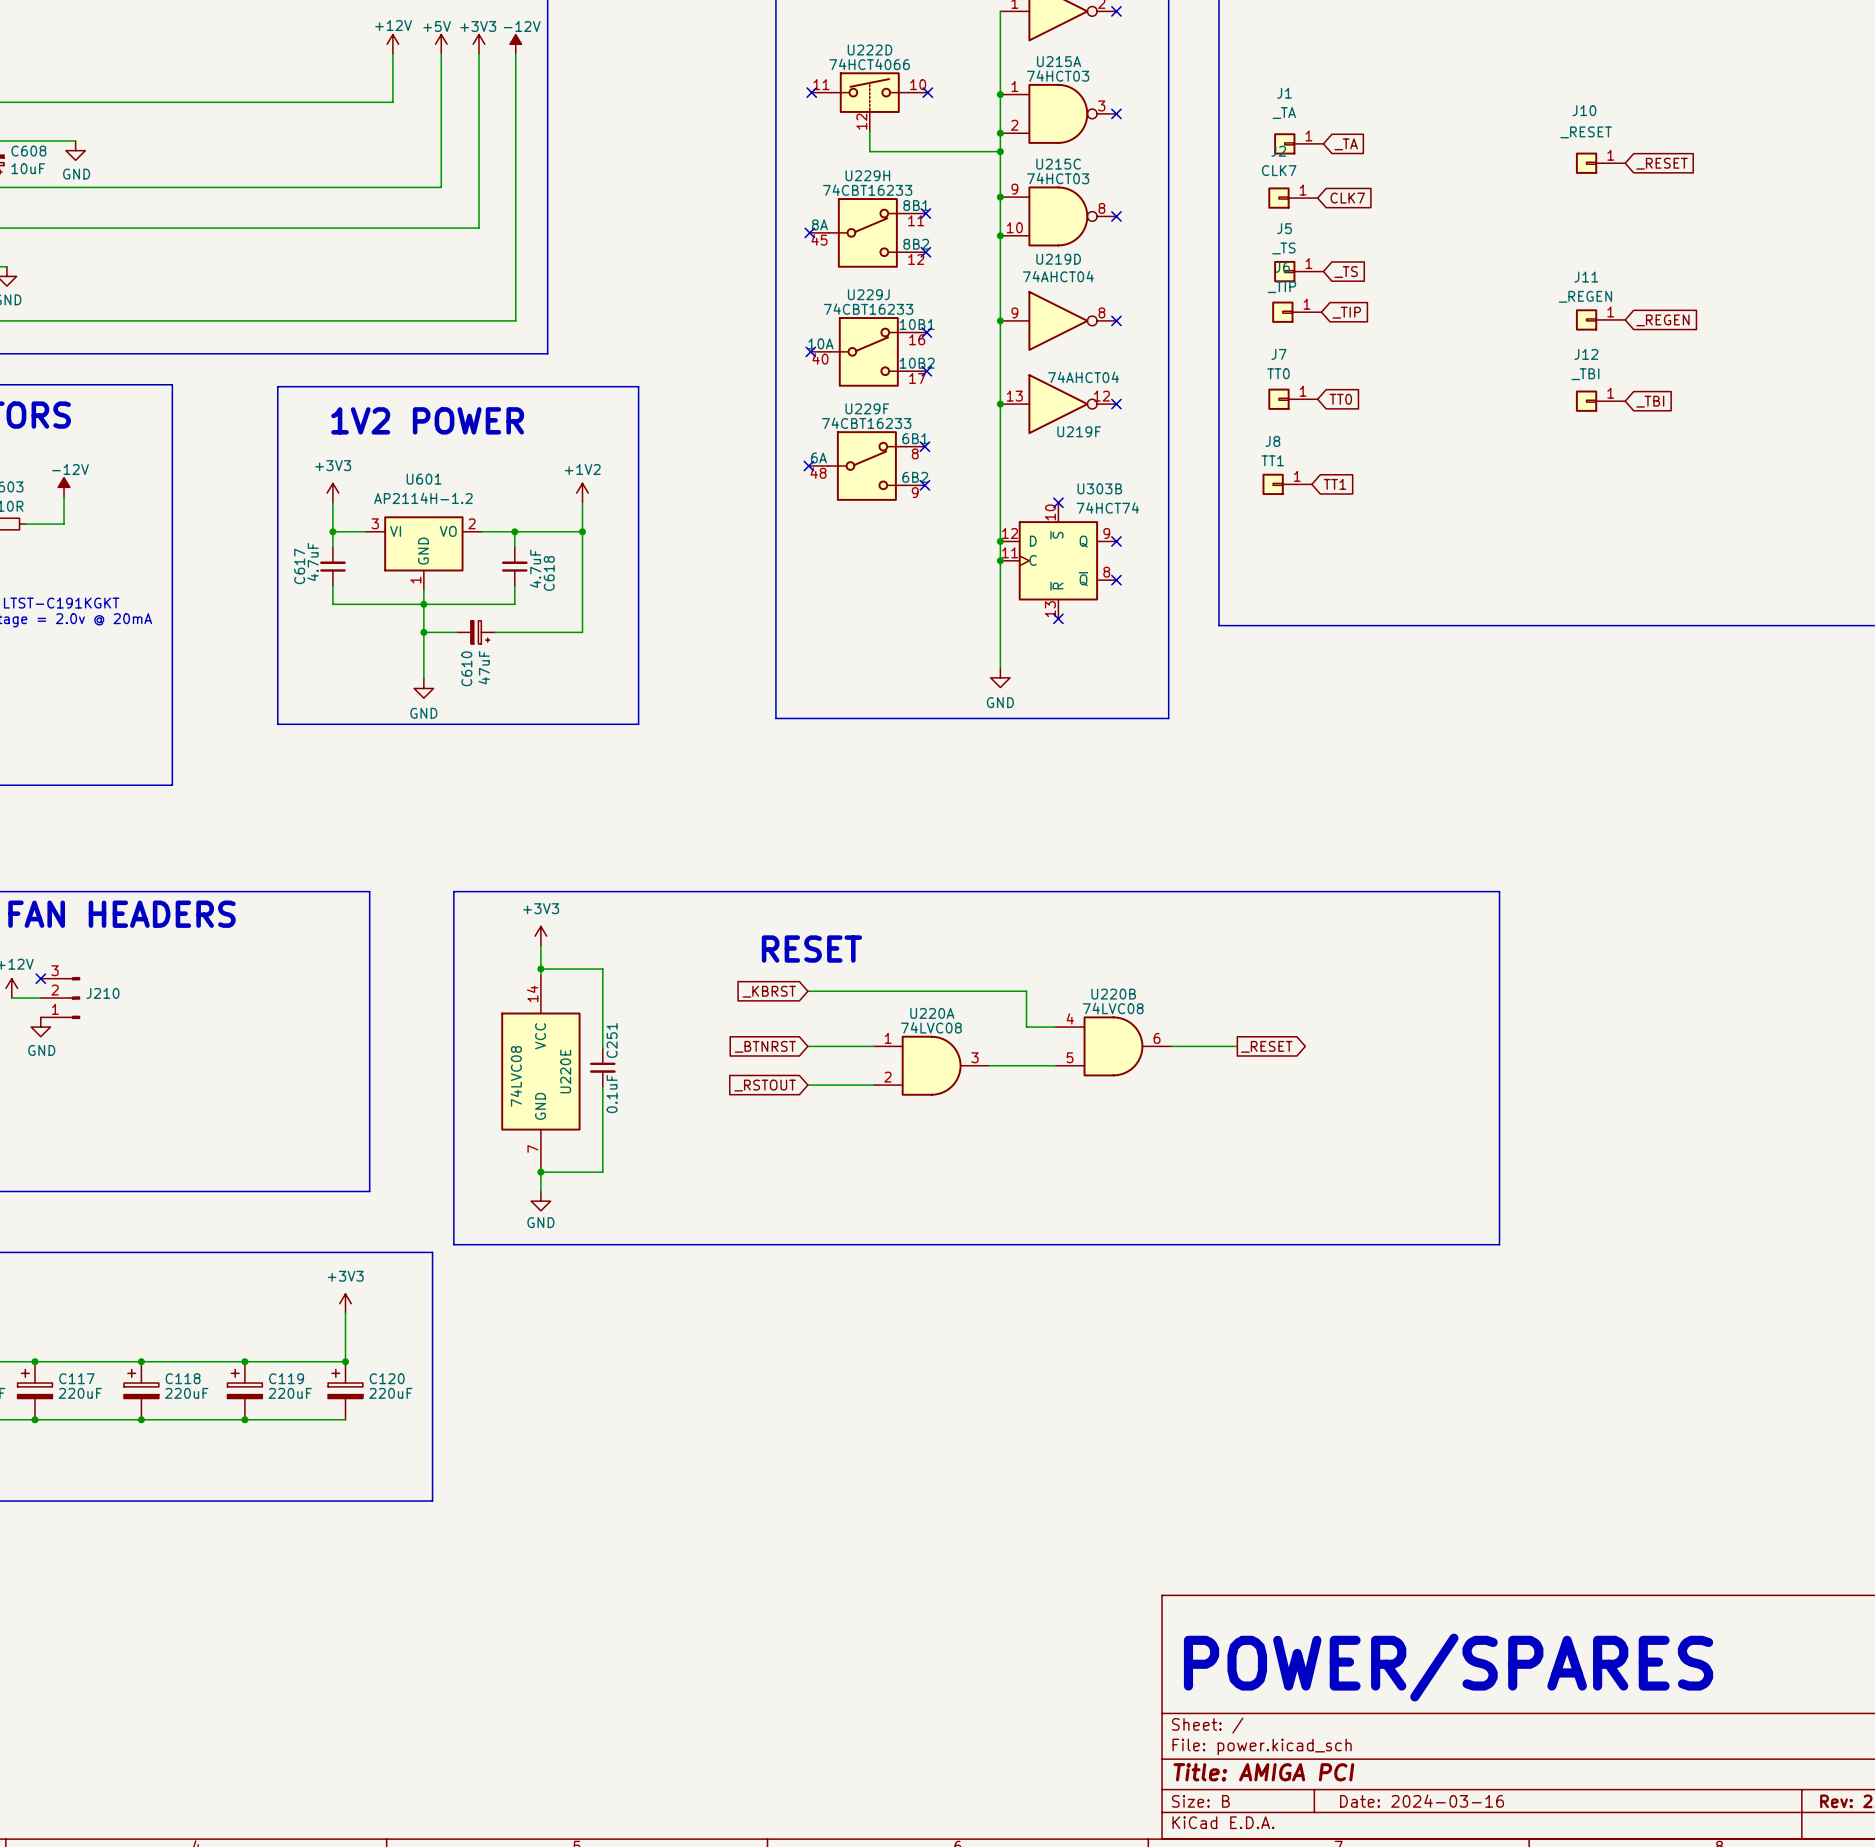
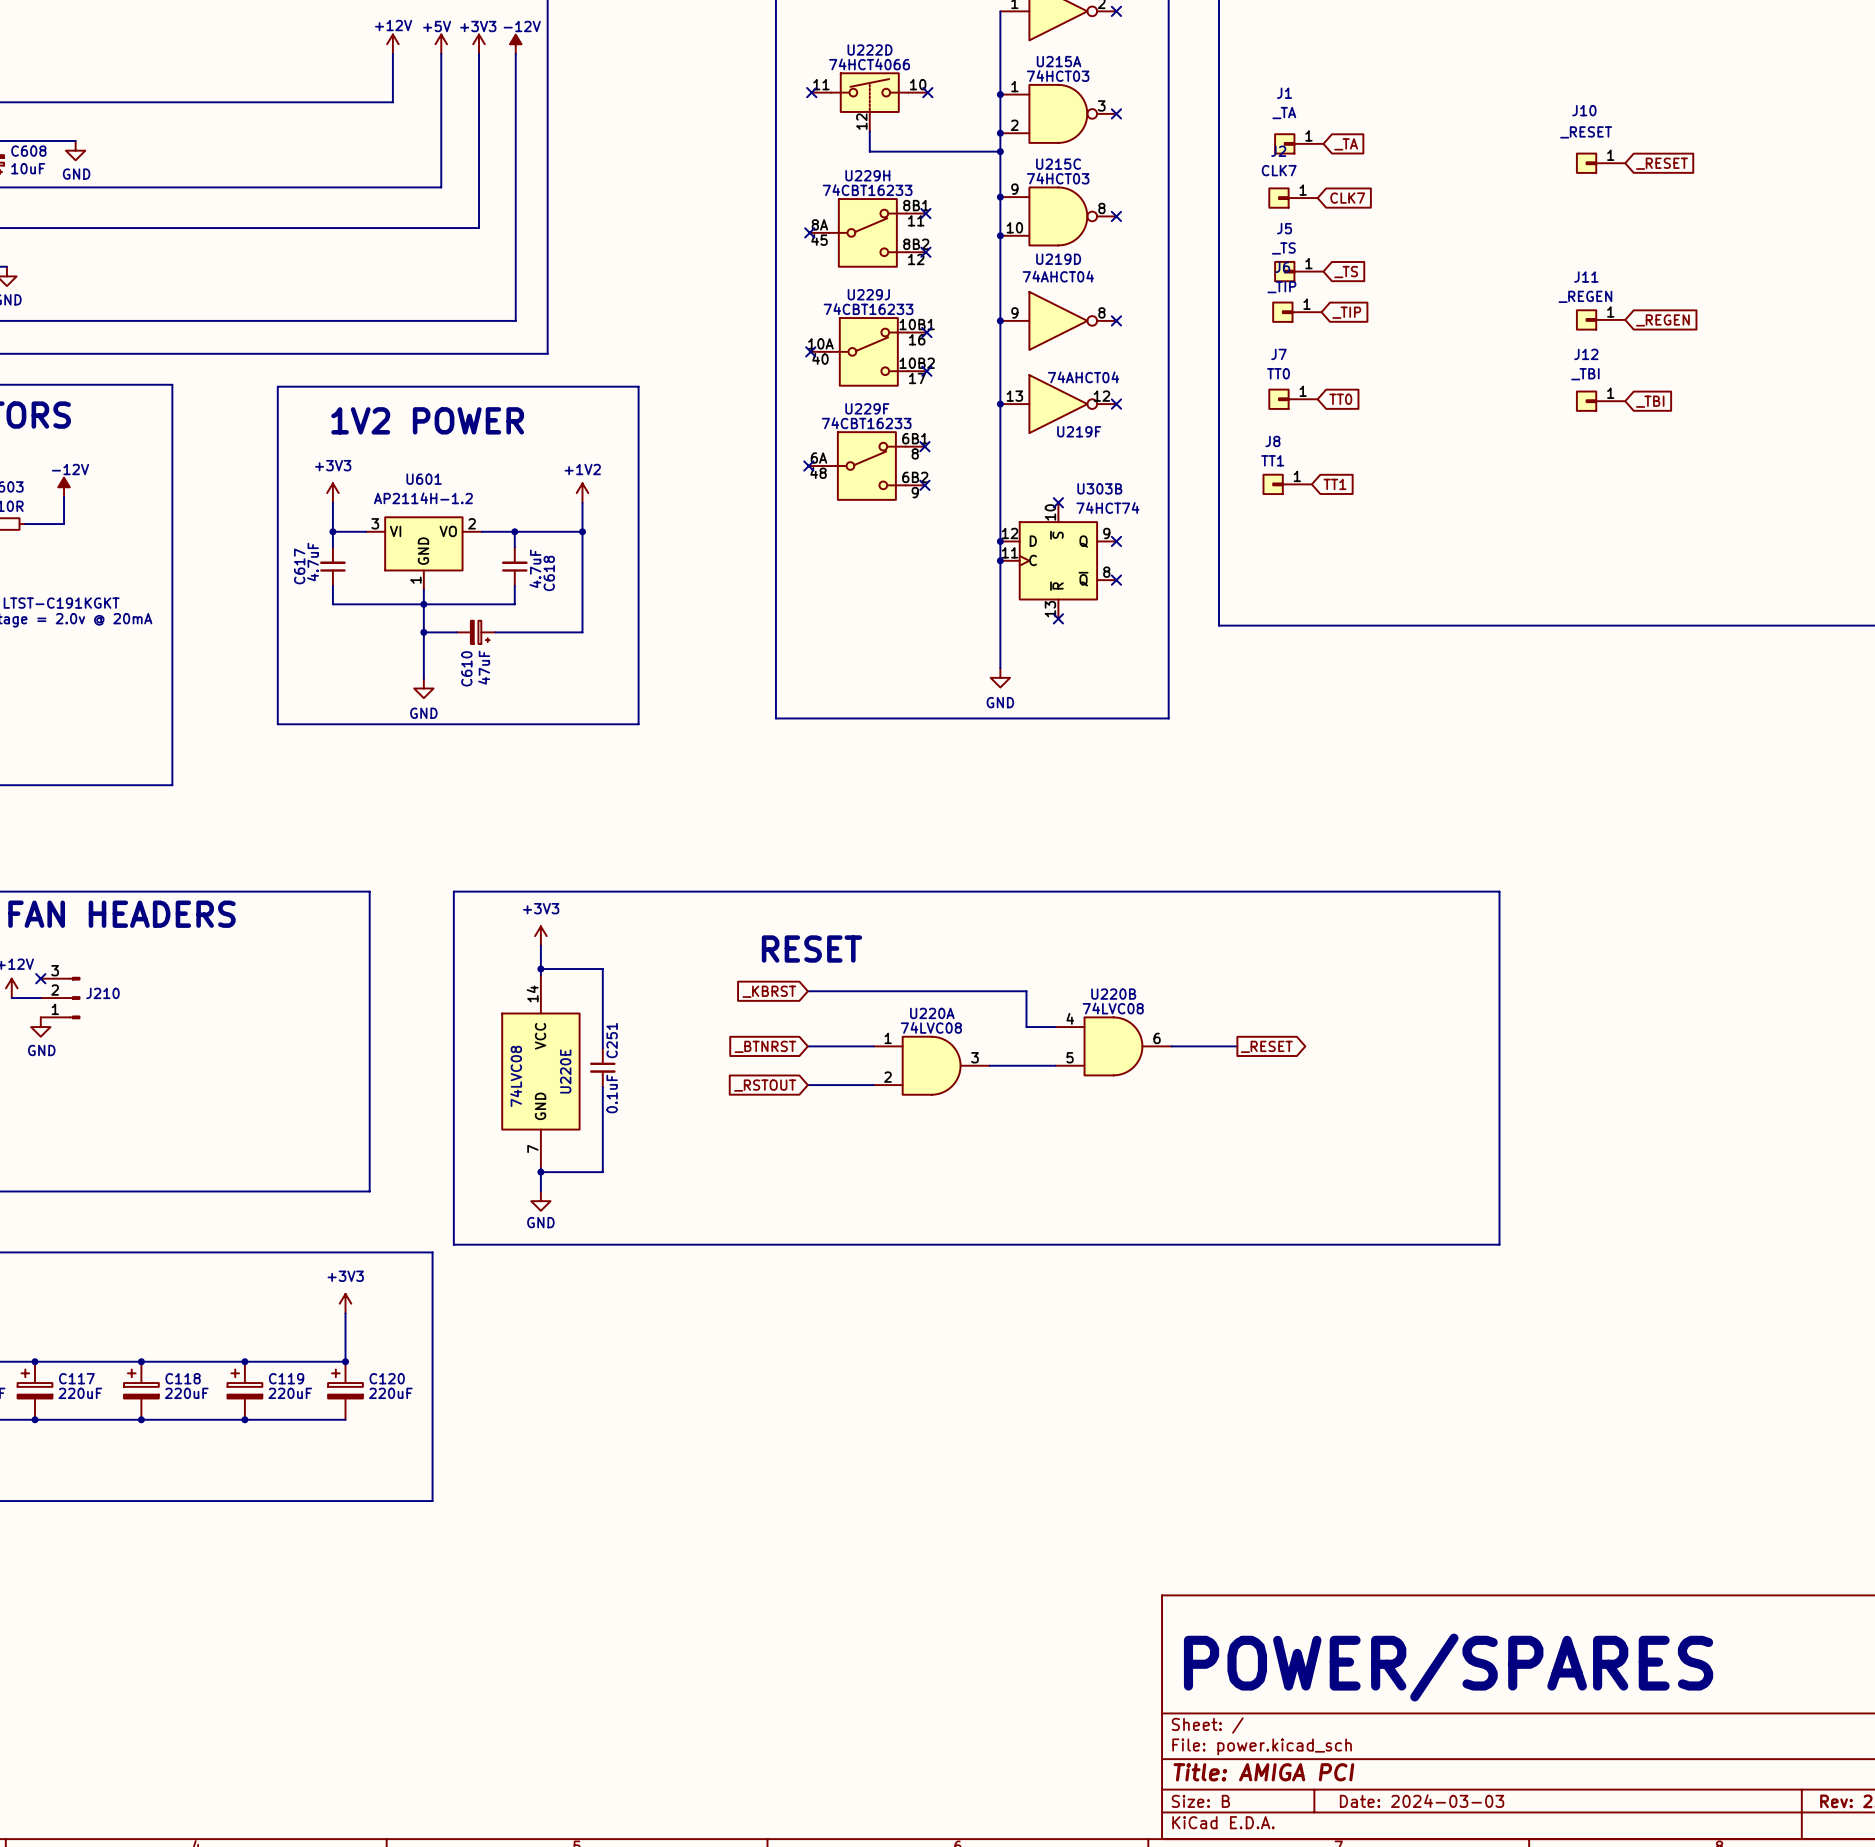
title block: Date: 2024-03-16 (1422, 1801) -> Date: 2024-03-03 (1422, 1801)

